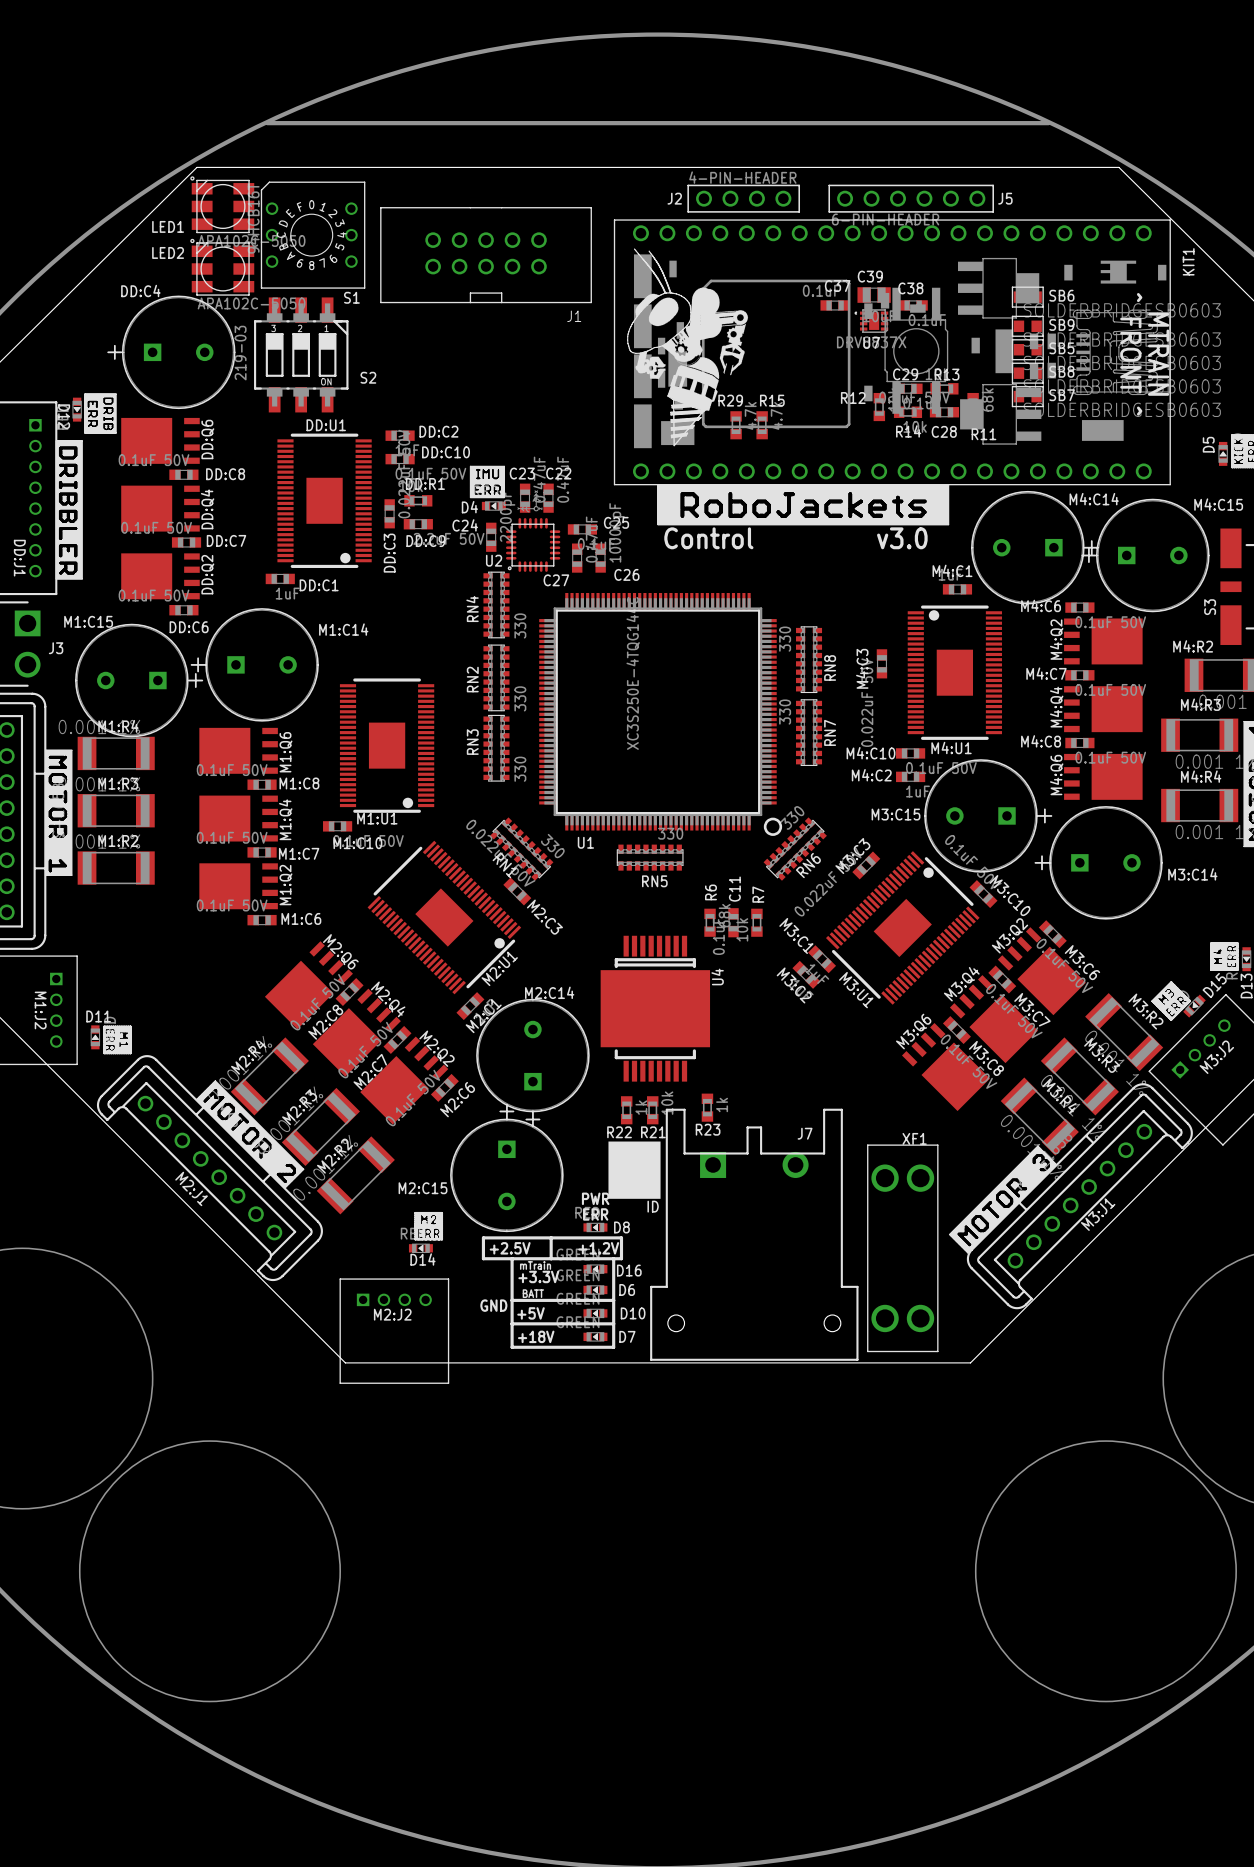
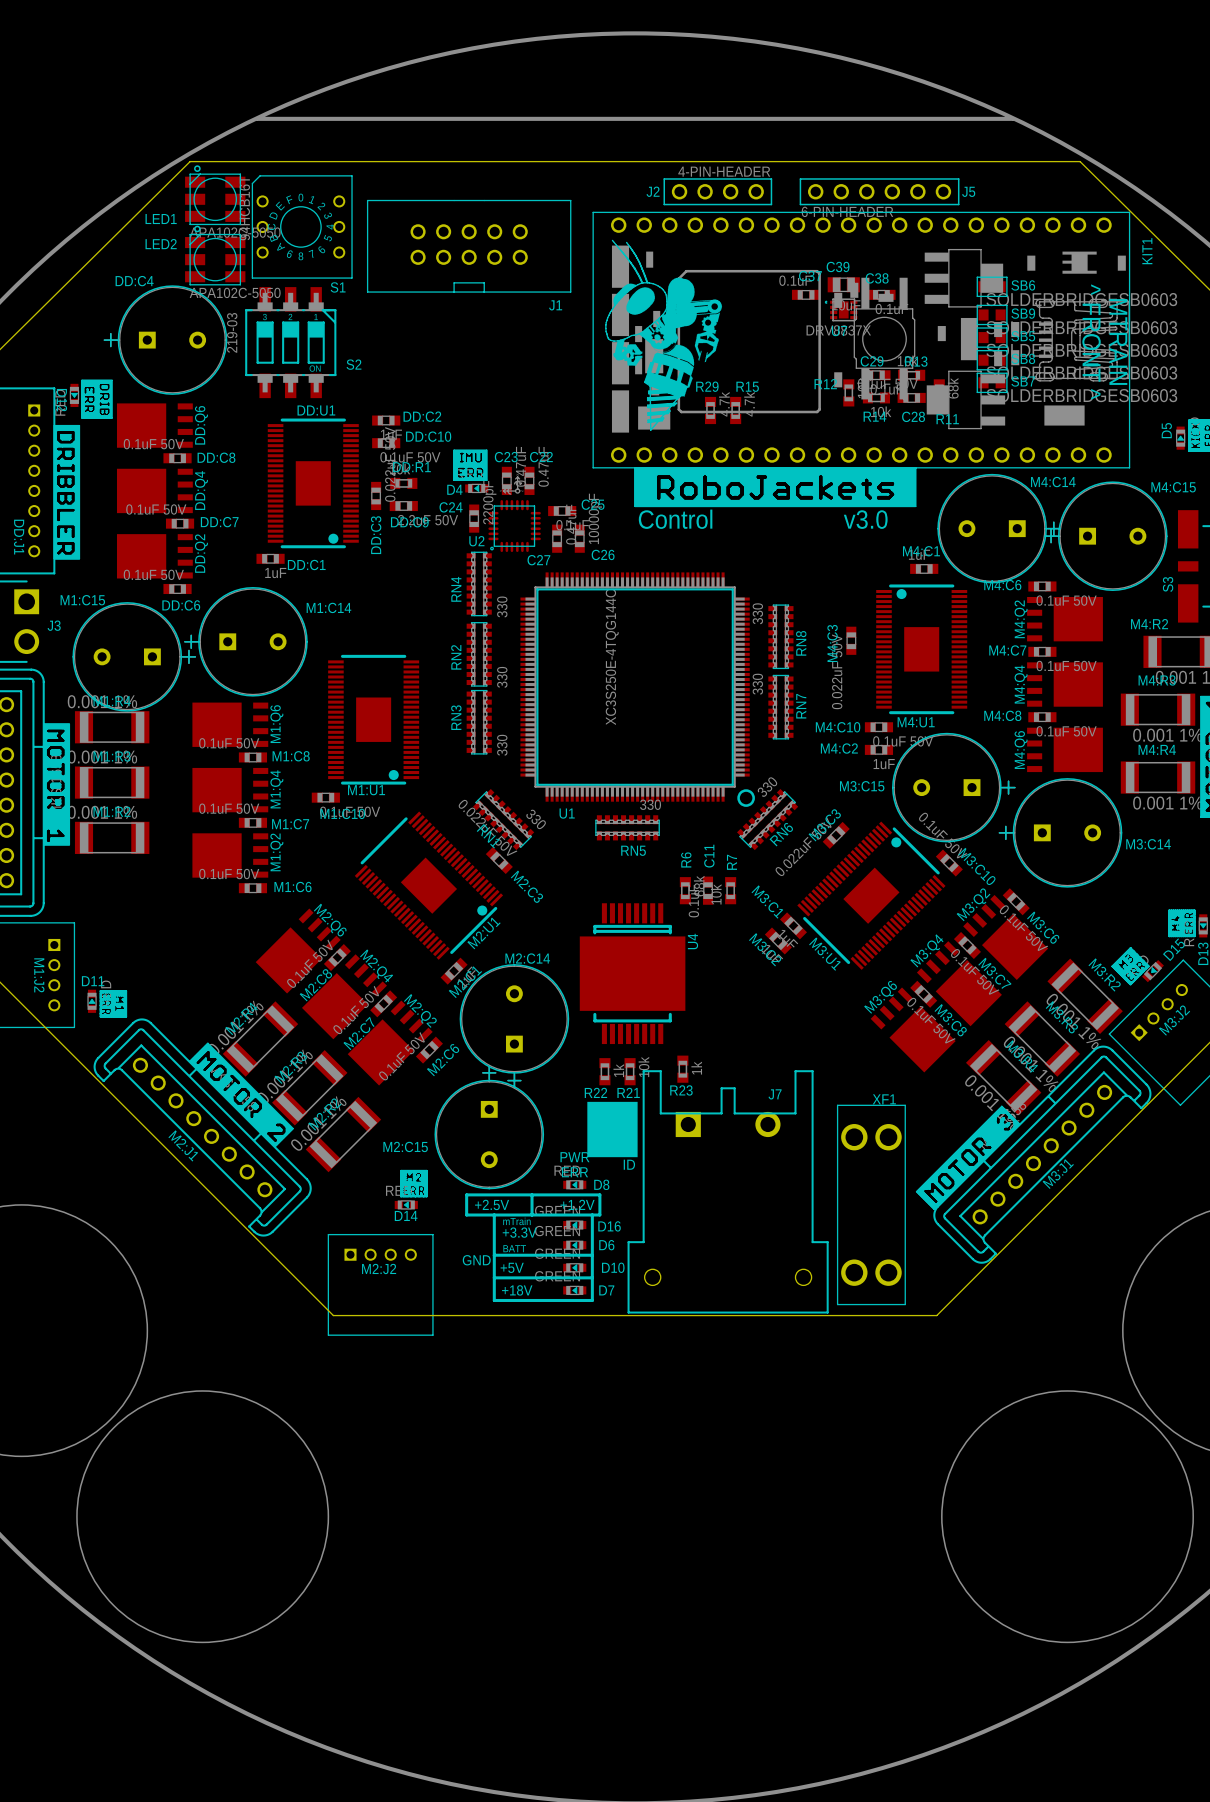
LED1 footprint: [190, 176, 255, 234] -> [185, 165, 246, 226]
LED2 footprint: [190, 238, 255, 296] -> [185, 225, 246, 286]

